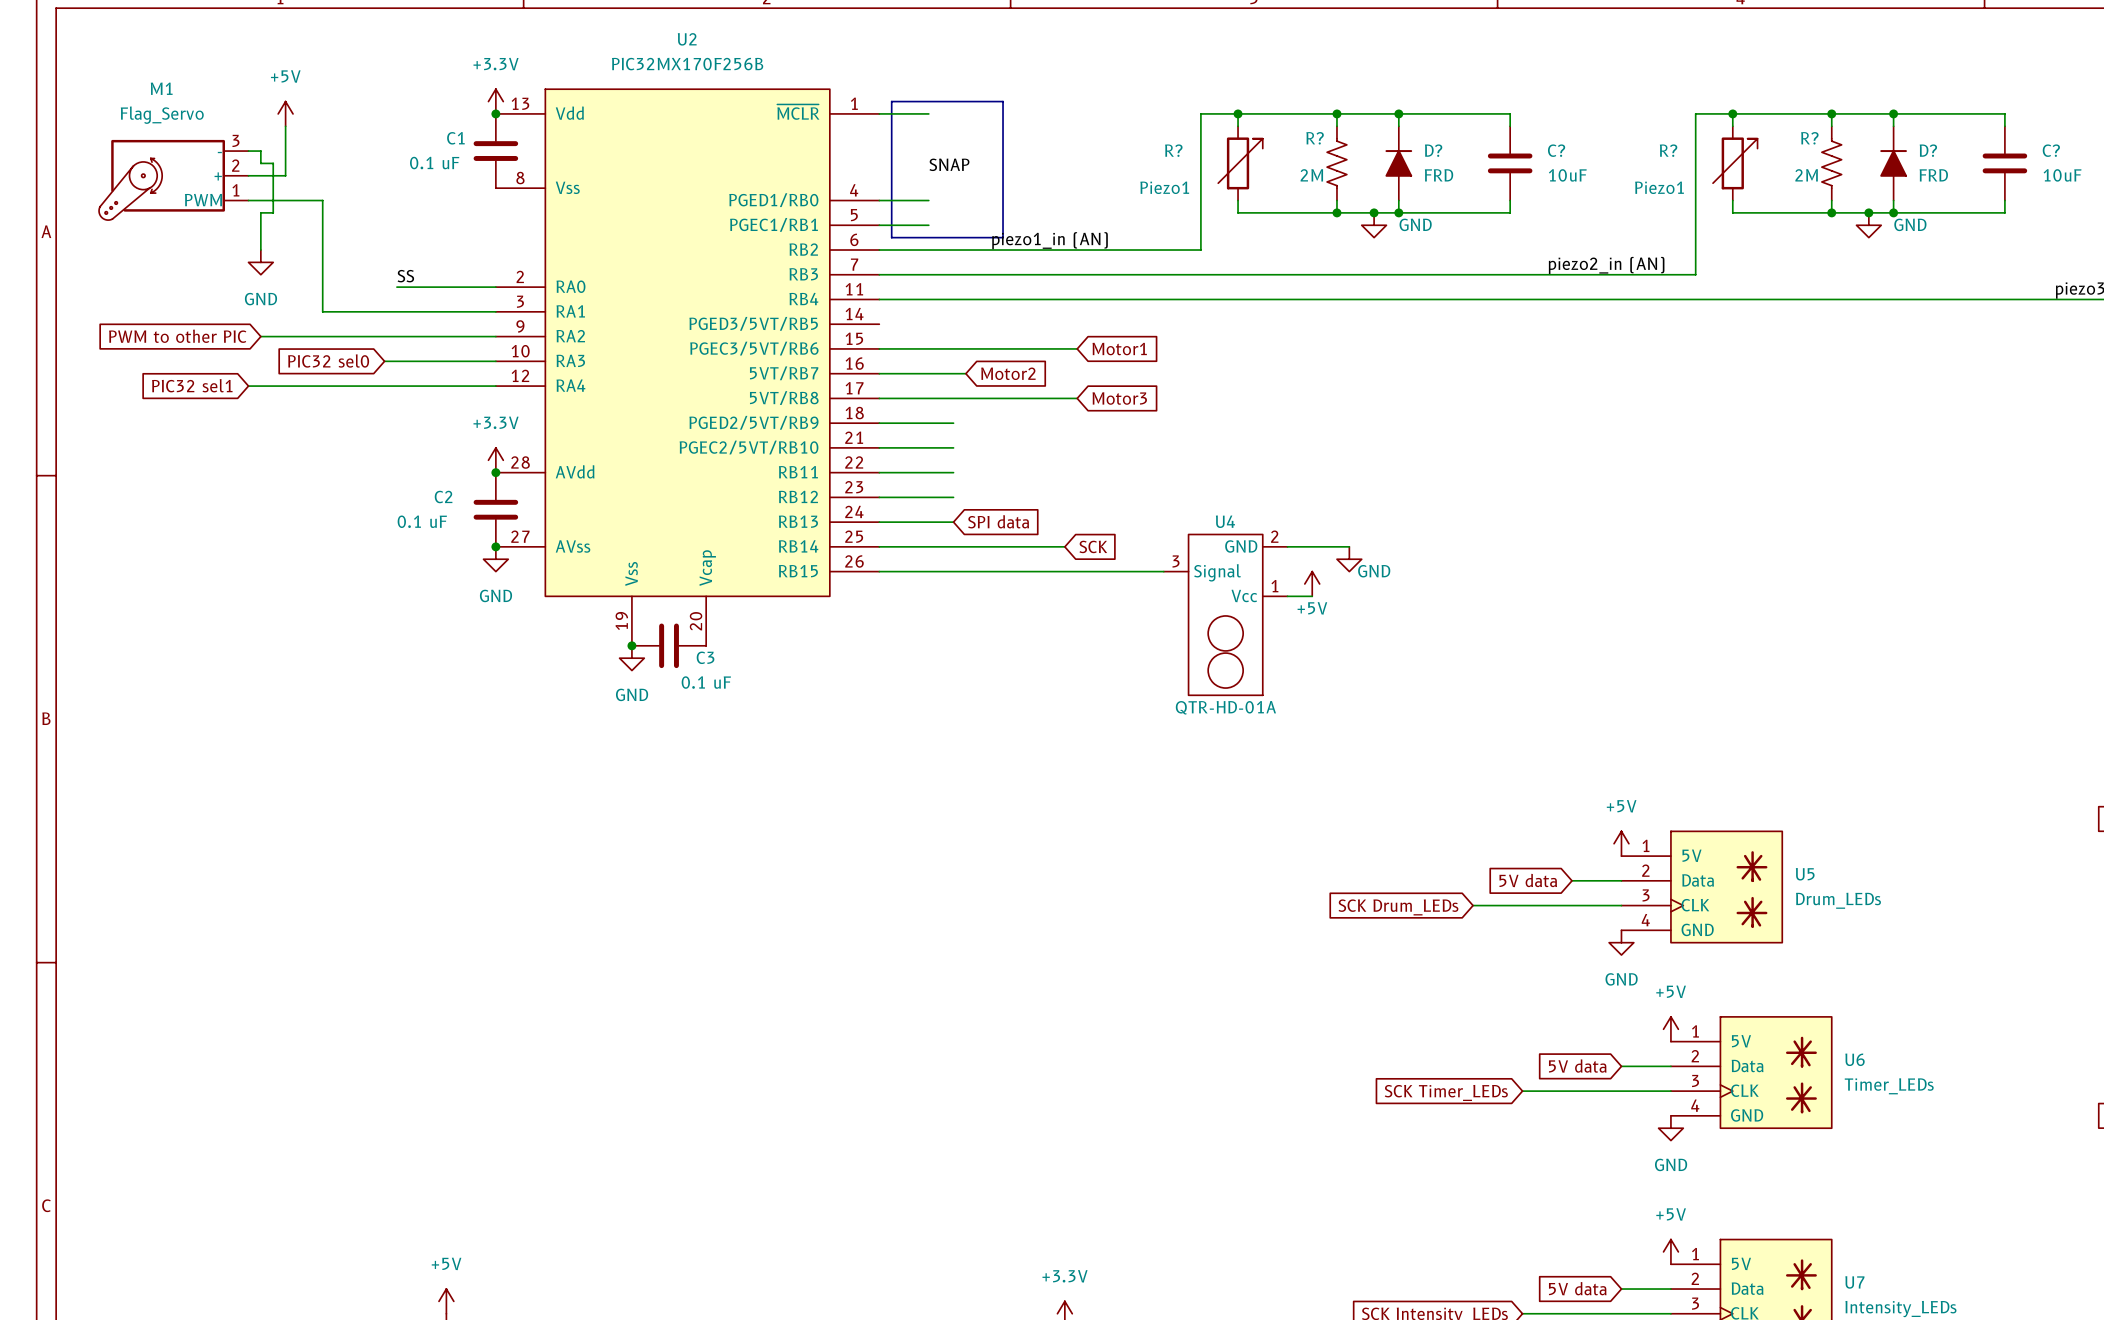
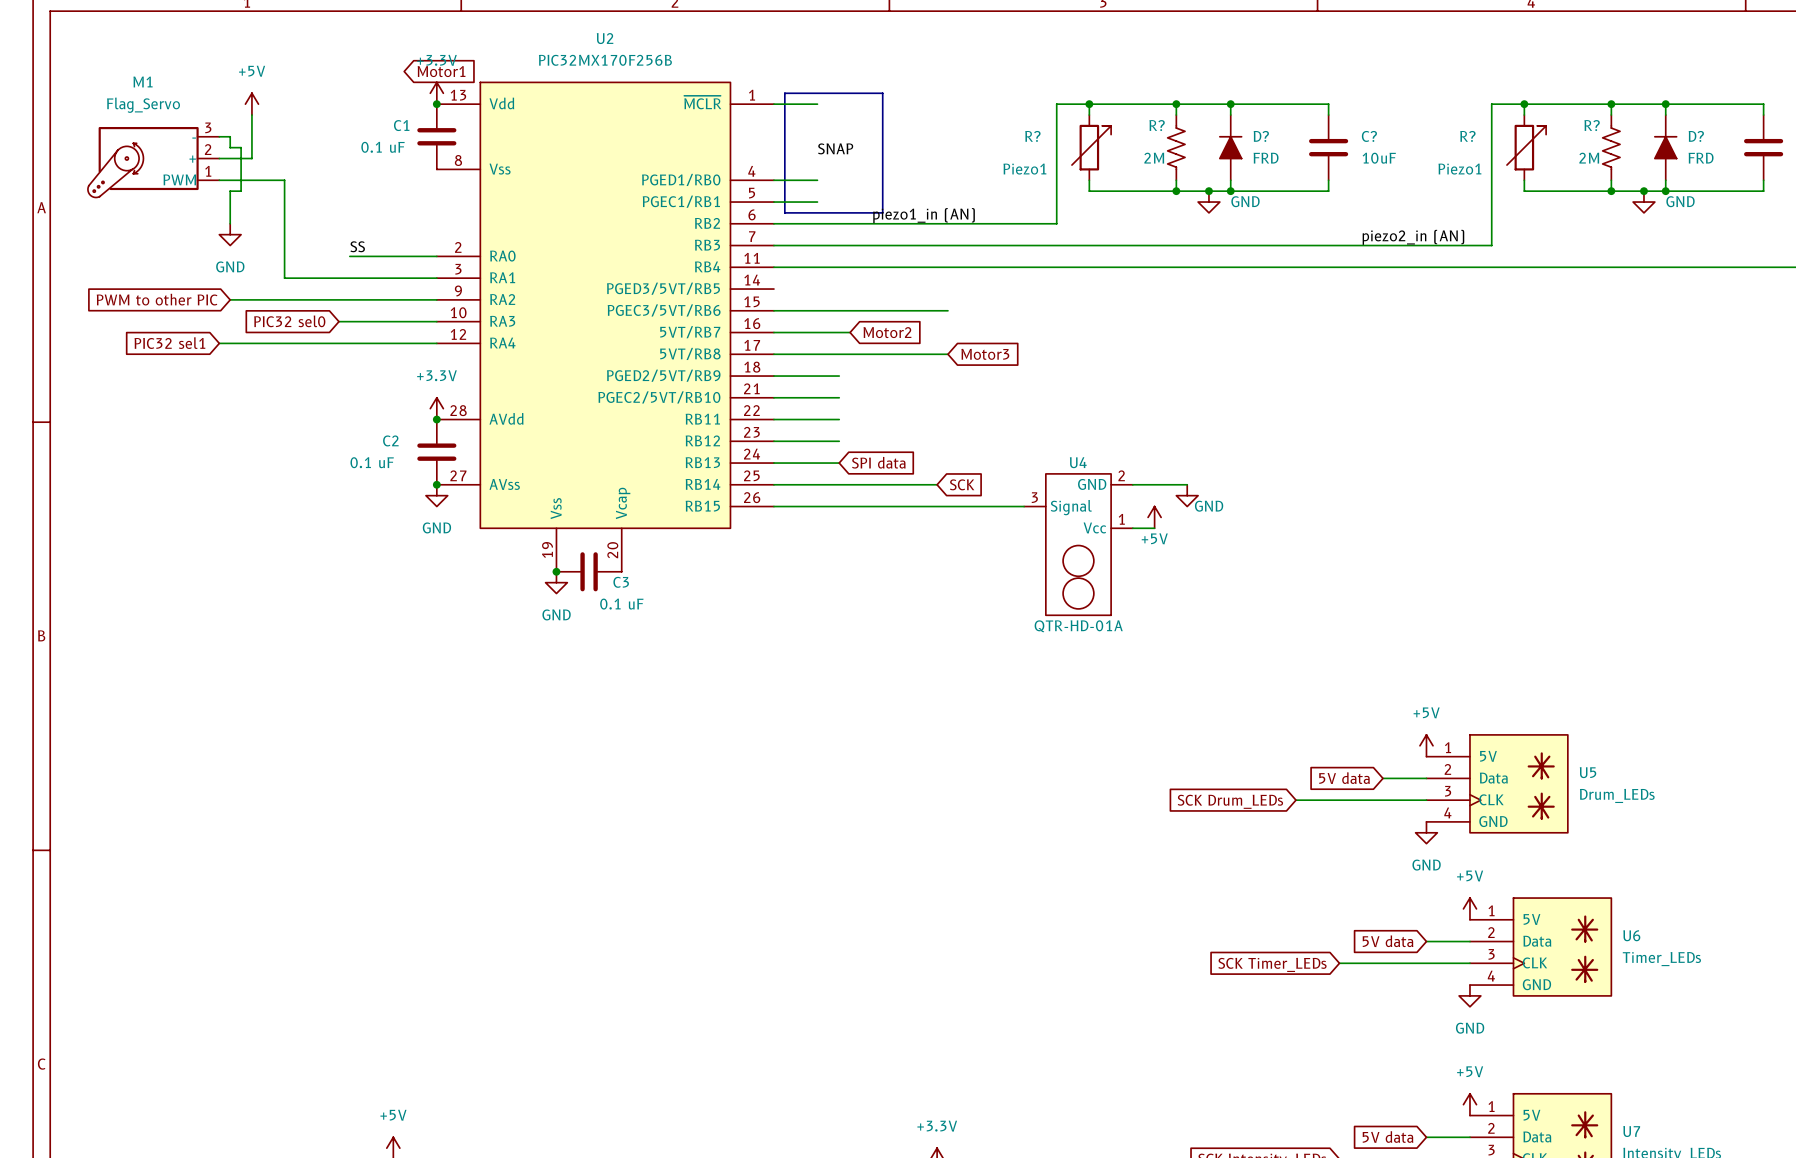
global label: none -> Motor1 (441, 71)
global label: Motor1 (1119, 349) -> none

